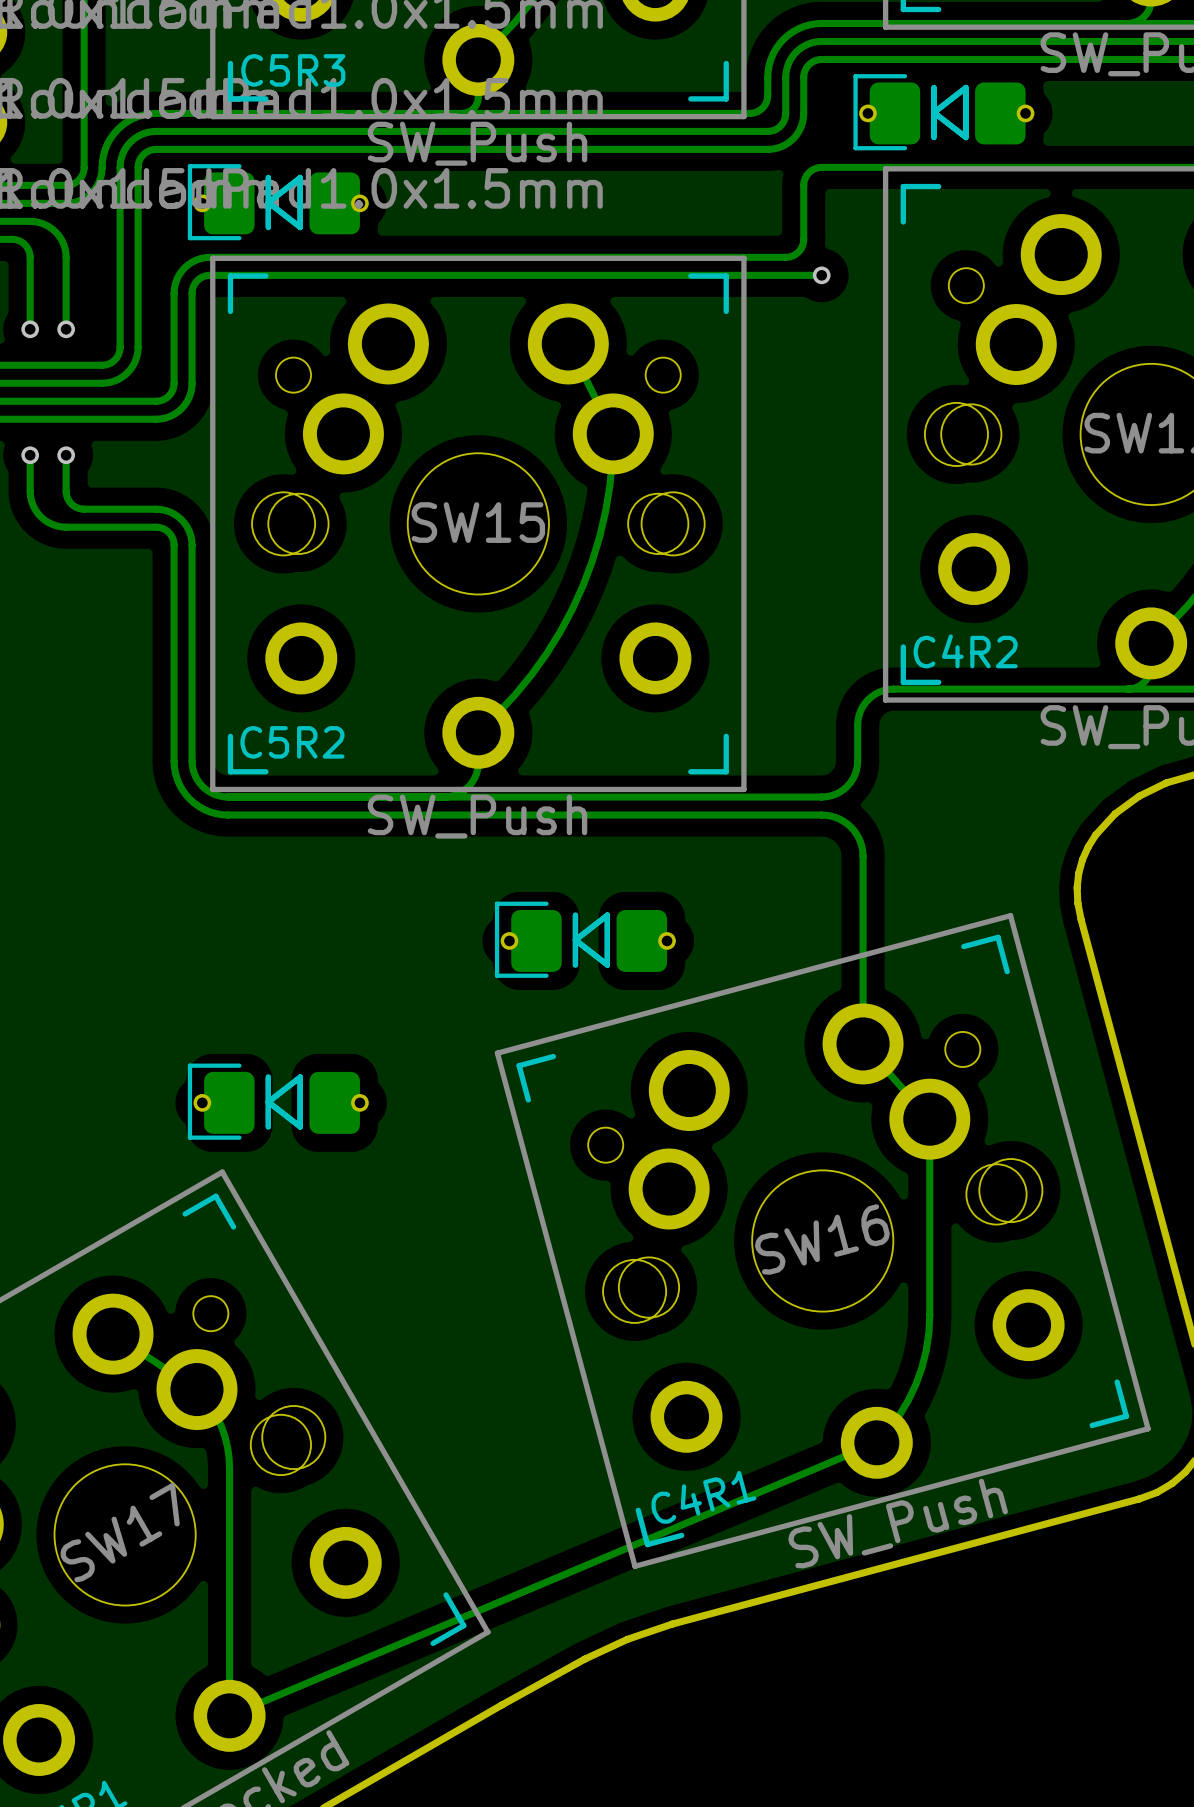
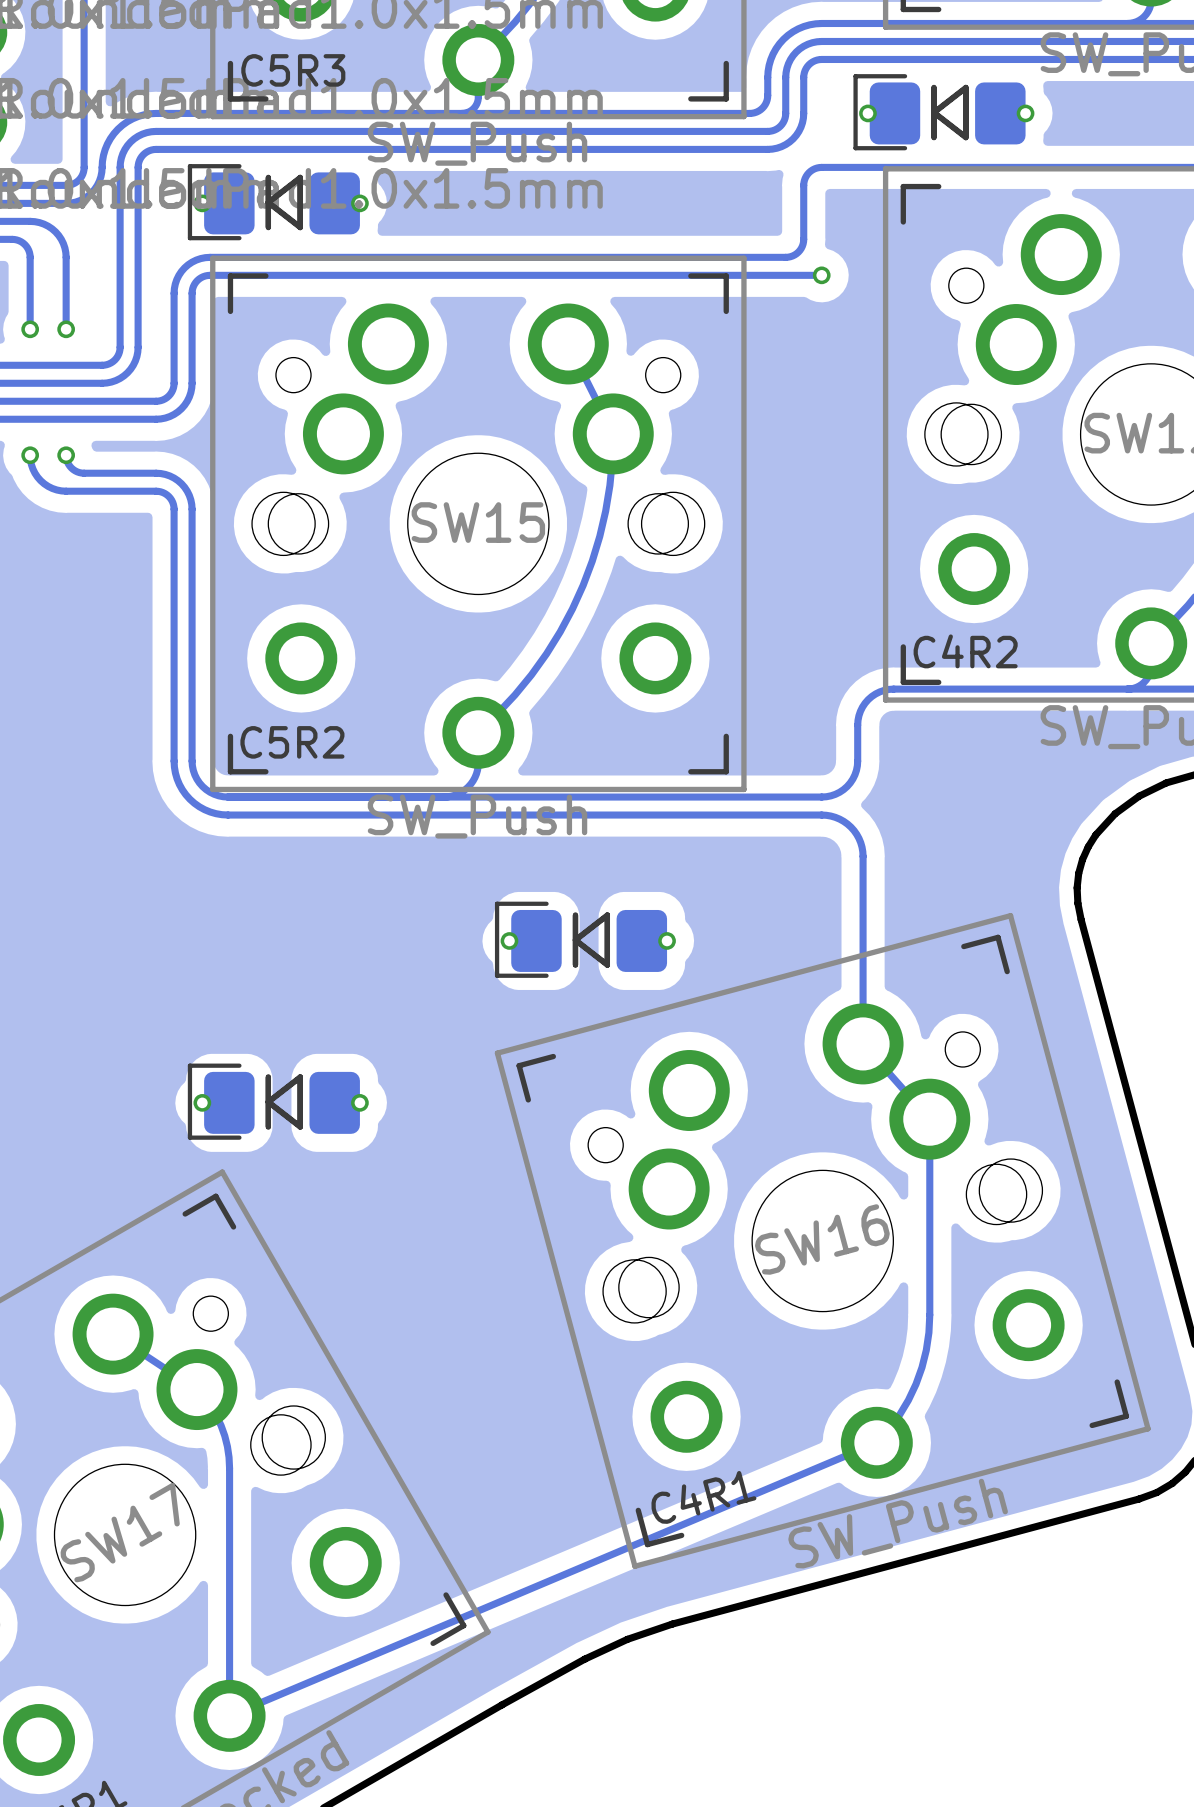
track: (30, 455) (31, 500) (37, 513) (48, 522) (66, 527) (158, 527) (170, 534) (174, 545) -> (30, 455) (32, 469) (37, 477) (48, 486) (56, 489) (156, 491) (165, 493) (170, 498) (173, 506) (174, 545)
track: (66, 455) (66, 493) (73, 505) (84, 509) (165, 510) (174, 514) (184, 523) (189, 531) (192, 545) -> (66, 455) (69, 466) (79, 472) (160, 473) (178, 480) (184, 487) (190, 499) (192, 545)

